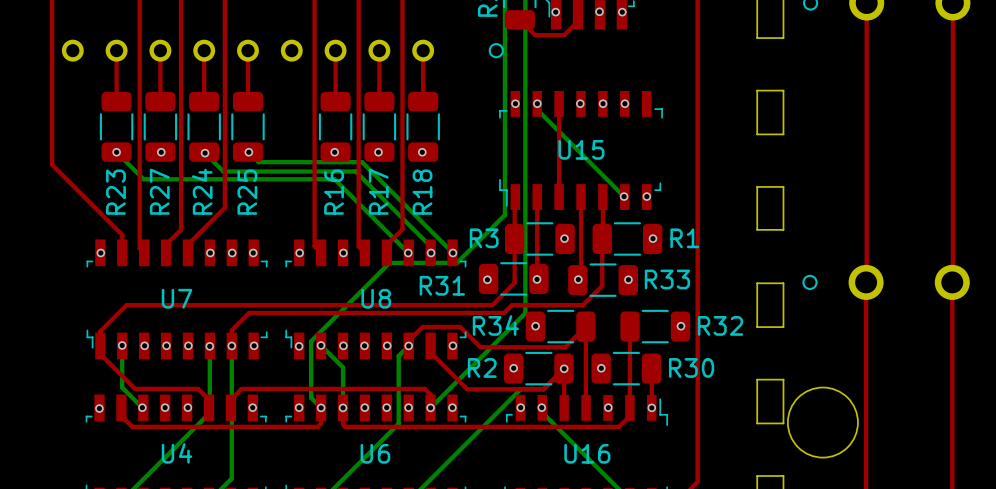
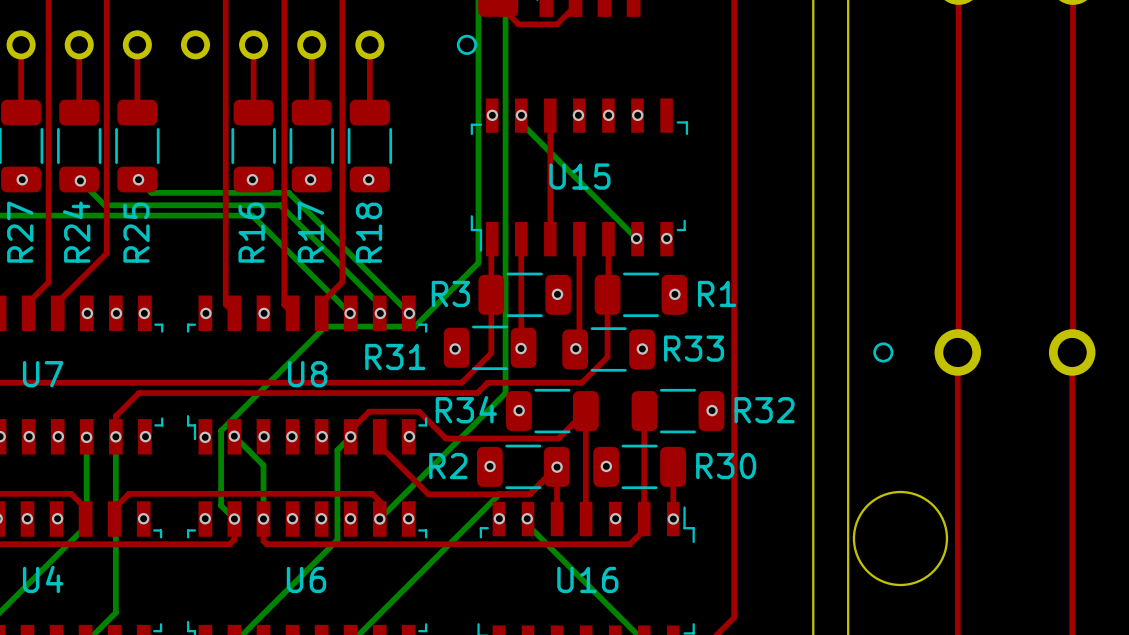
board edge: (757, 38) (783, 38) -> (813, 28) (813, 97)
board edge: (757, 90) (783, 90) -> (848, 28) (848, 97)
board edge: (757, 134) (783, 134) -> (813, 156) (813, 225)
board edge: (757, 186) (783, 186) -> (848, 156) (848, 225)
board edge: (757, 229) (783, 229) -> (813, 282) (813, 353)
board edge: (757, 283) (783, 283) -> (848, 282) (848, 353)
board edge: (757, 327) (783, 327) -> (813, 411) (813, 481)
board edge: (757, 379) (783, 379) -> (848, 411) (848, 481)
board edge: (757, 423) (783, 423) -> (813, 539) (813, 609)
board edge: (757, 475) (783, 475) -> (848, 539) (848, 609)

